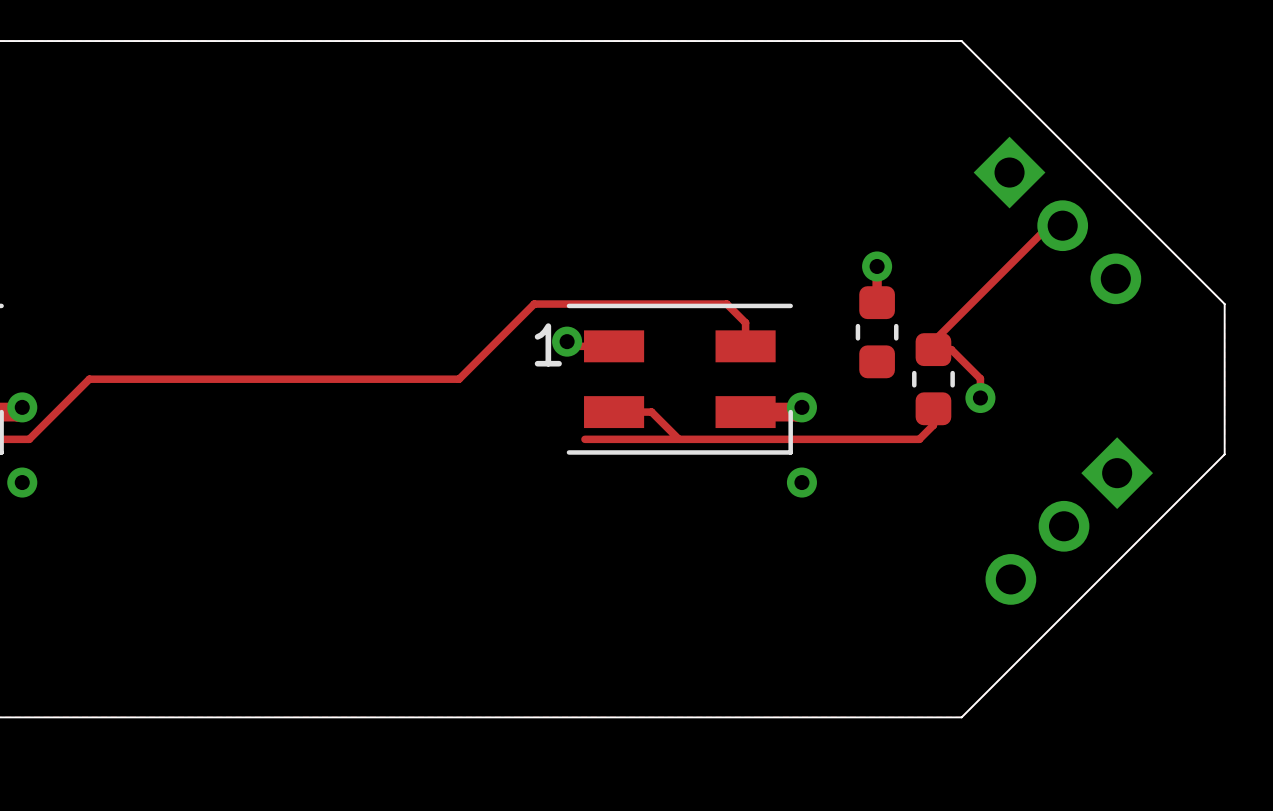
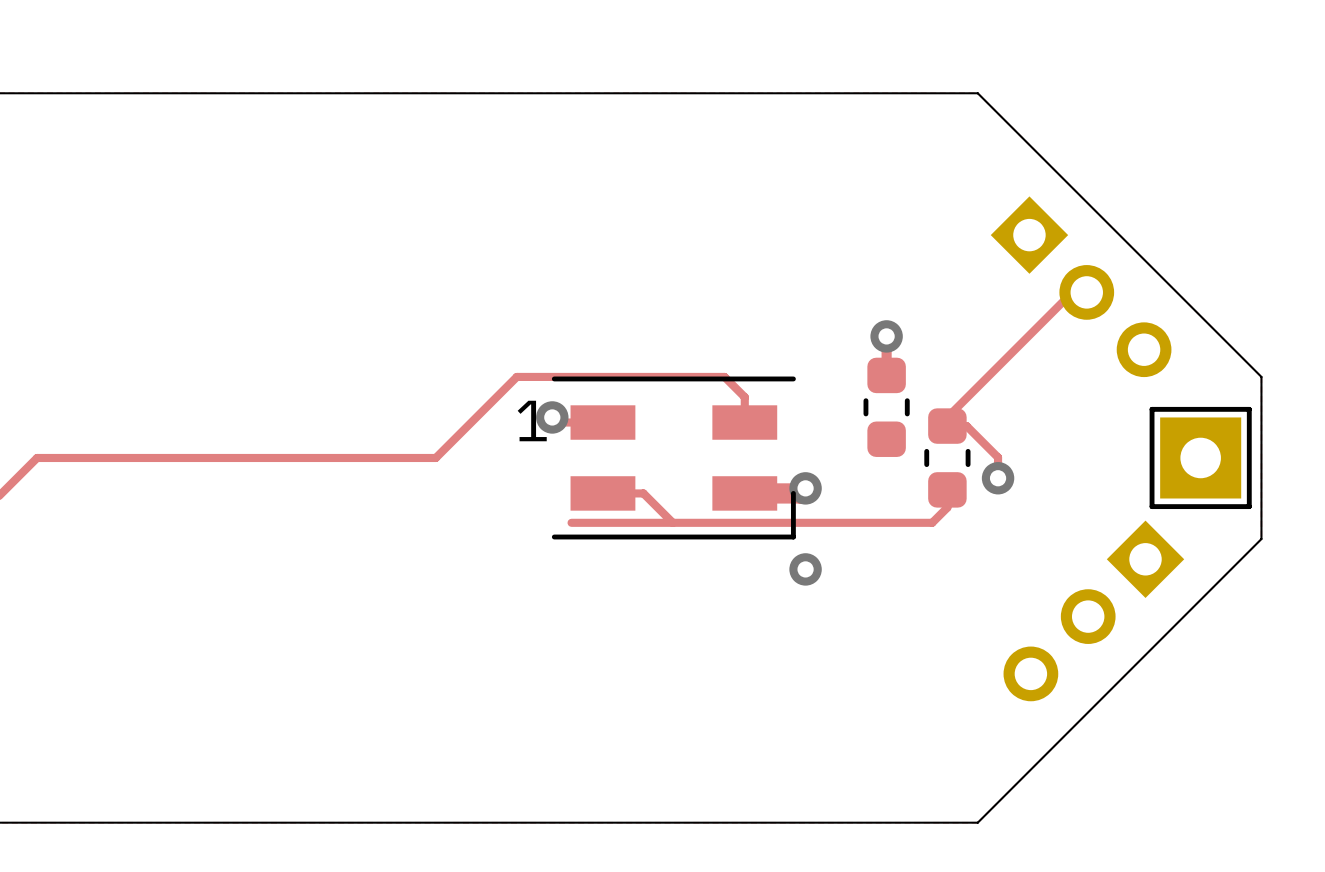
part: none -> (1200, 457)

